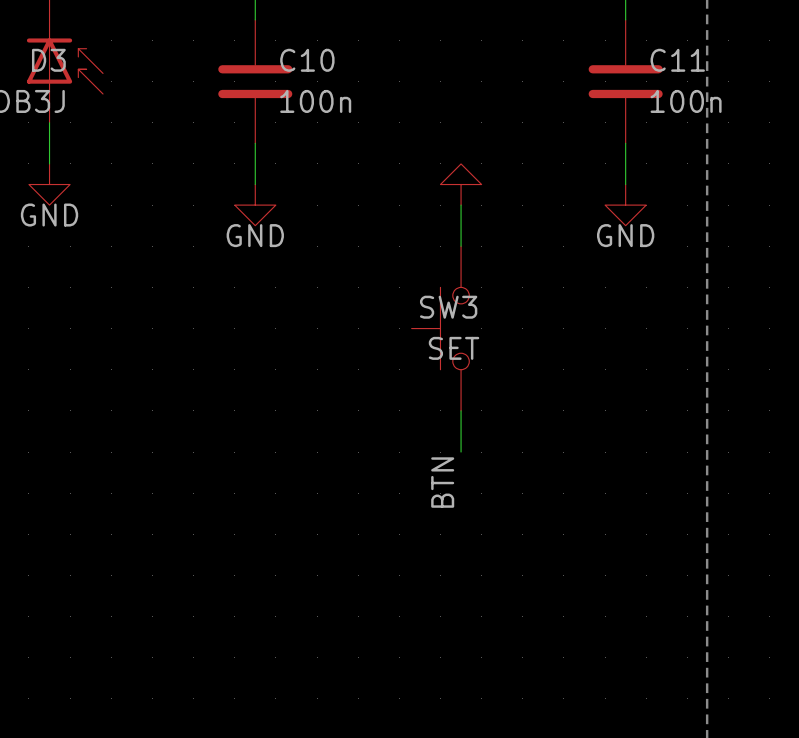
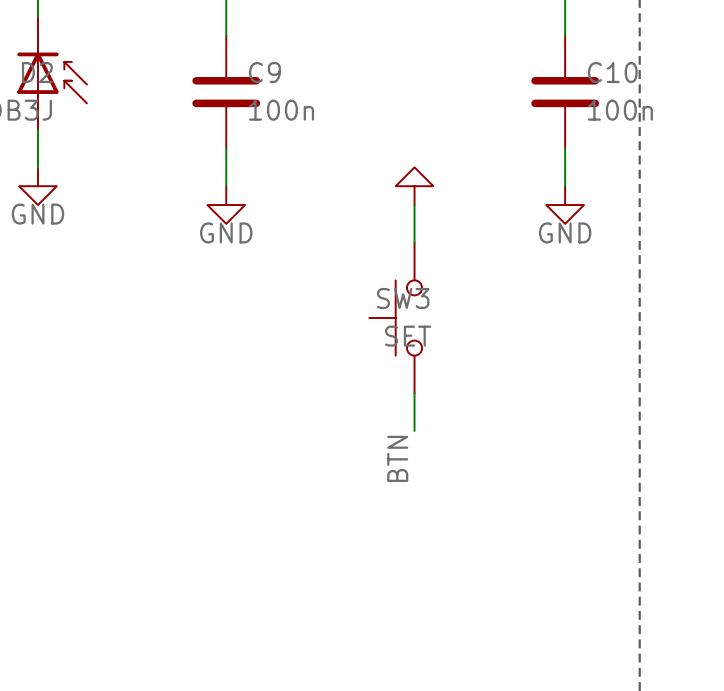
D3 name: D3 (48, 60) -> D2 (37, 72)
C10 name: C10 (307, 60) -> C9 (264, 72)
C11 name: C11 (677, 60) -> C10 (612, 72)

